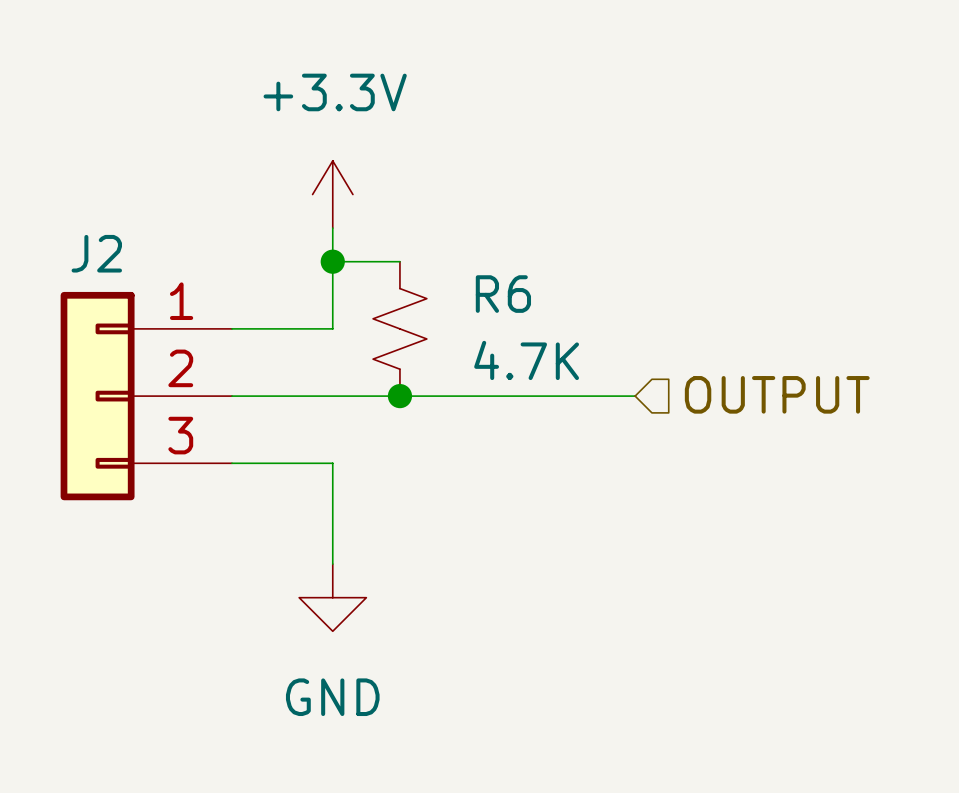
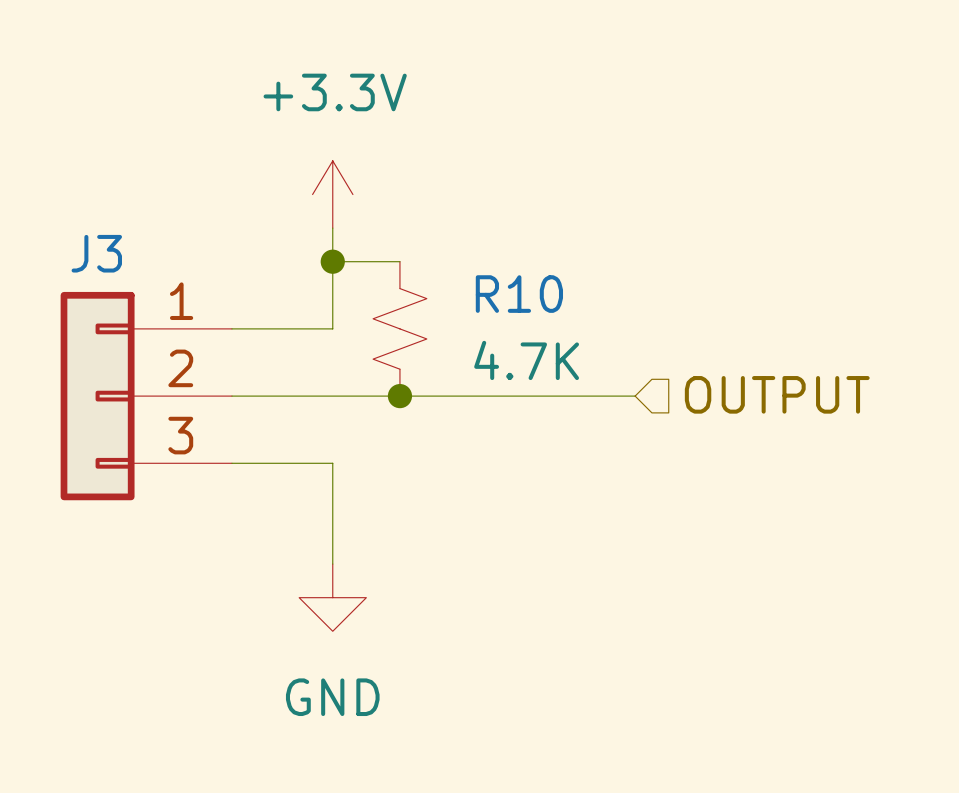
J2 name: J2 (96, 253) -> J3 (96, 253)
R6 name: R6 (503, 294) -> R10 (519, 294)

